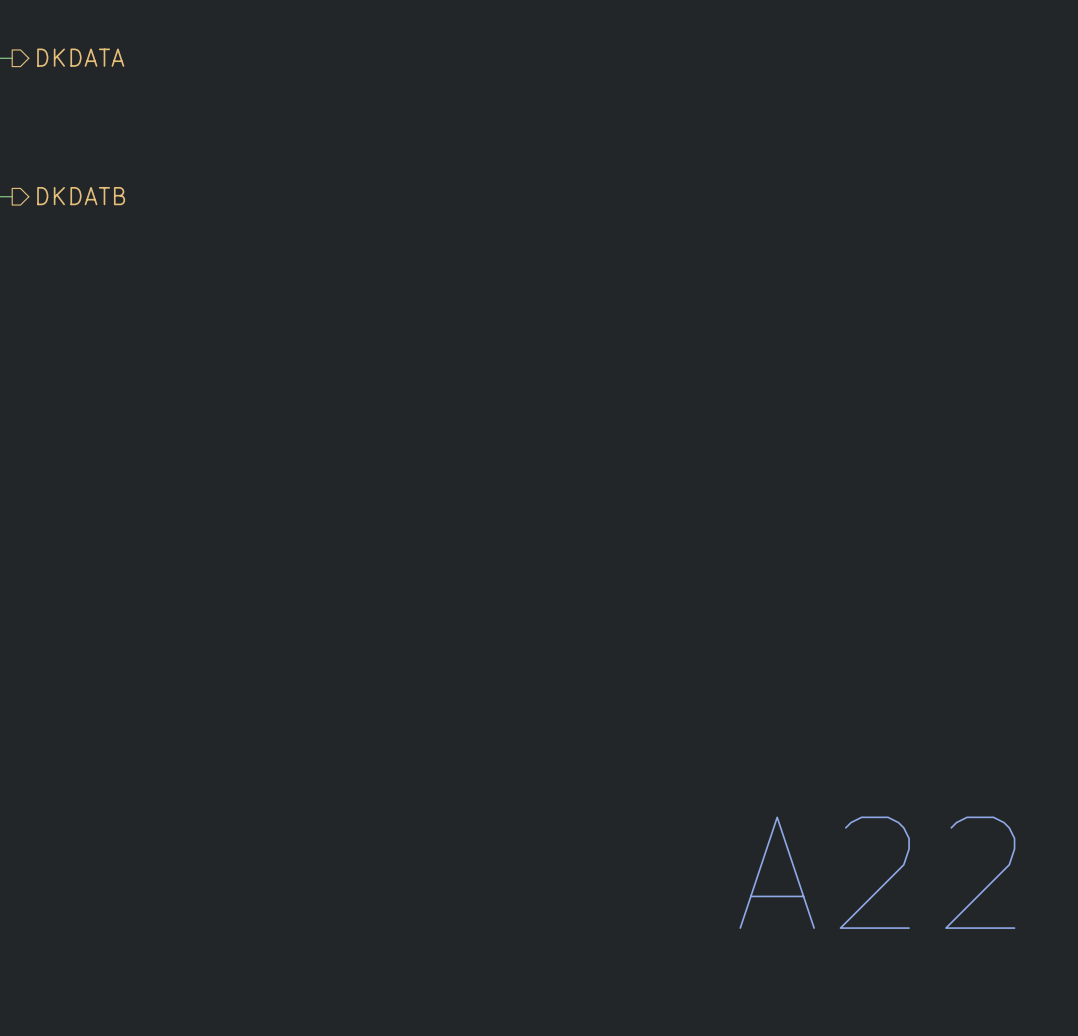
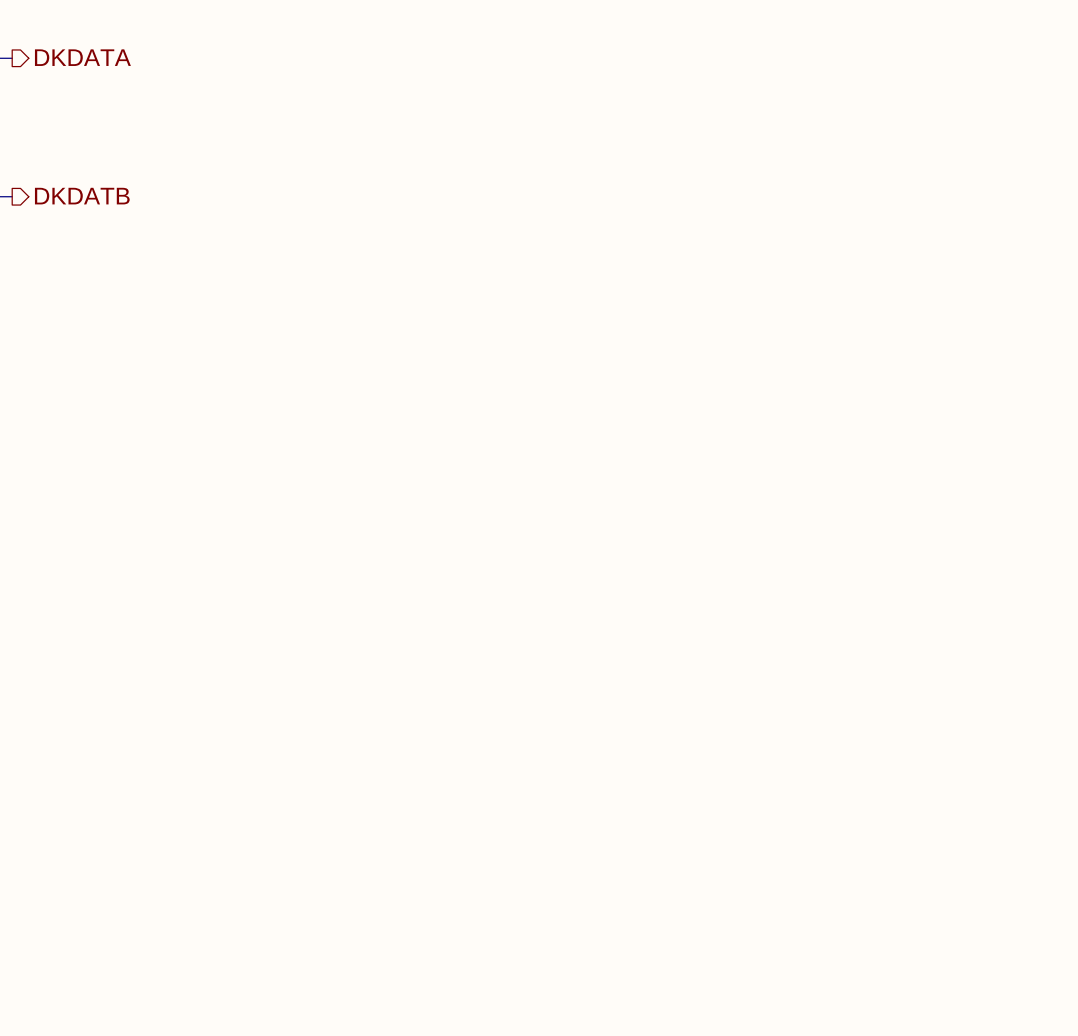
text: A22 (877, 872) -> none

